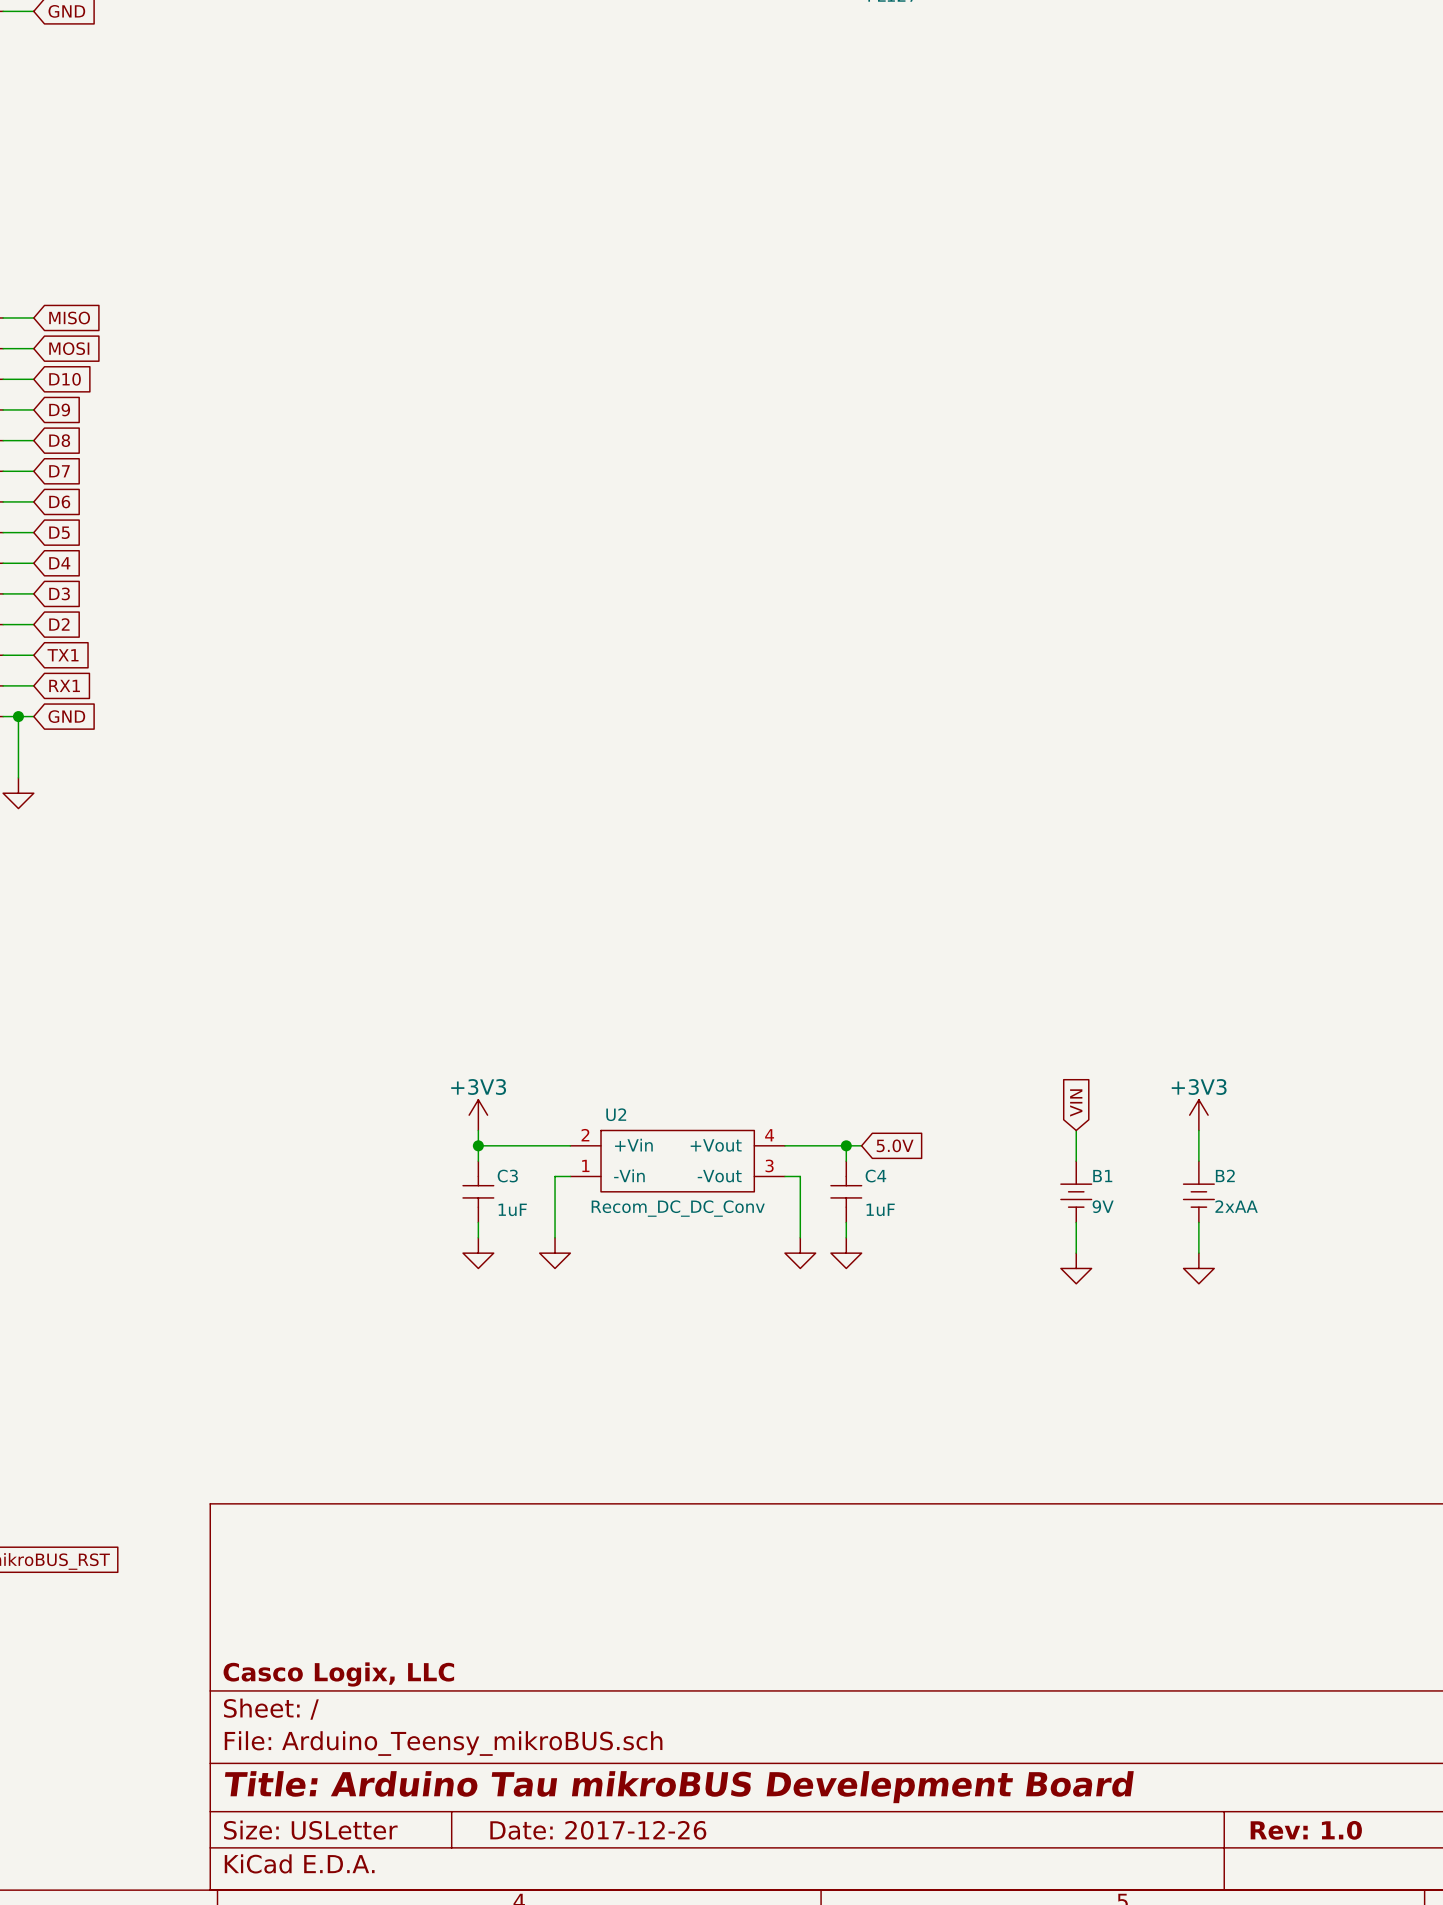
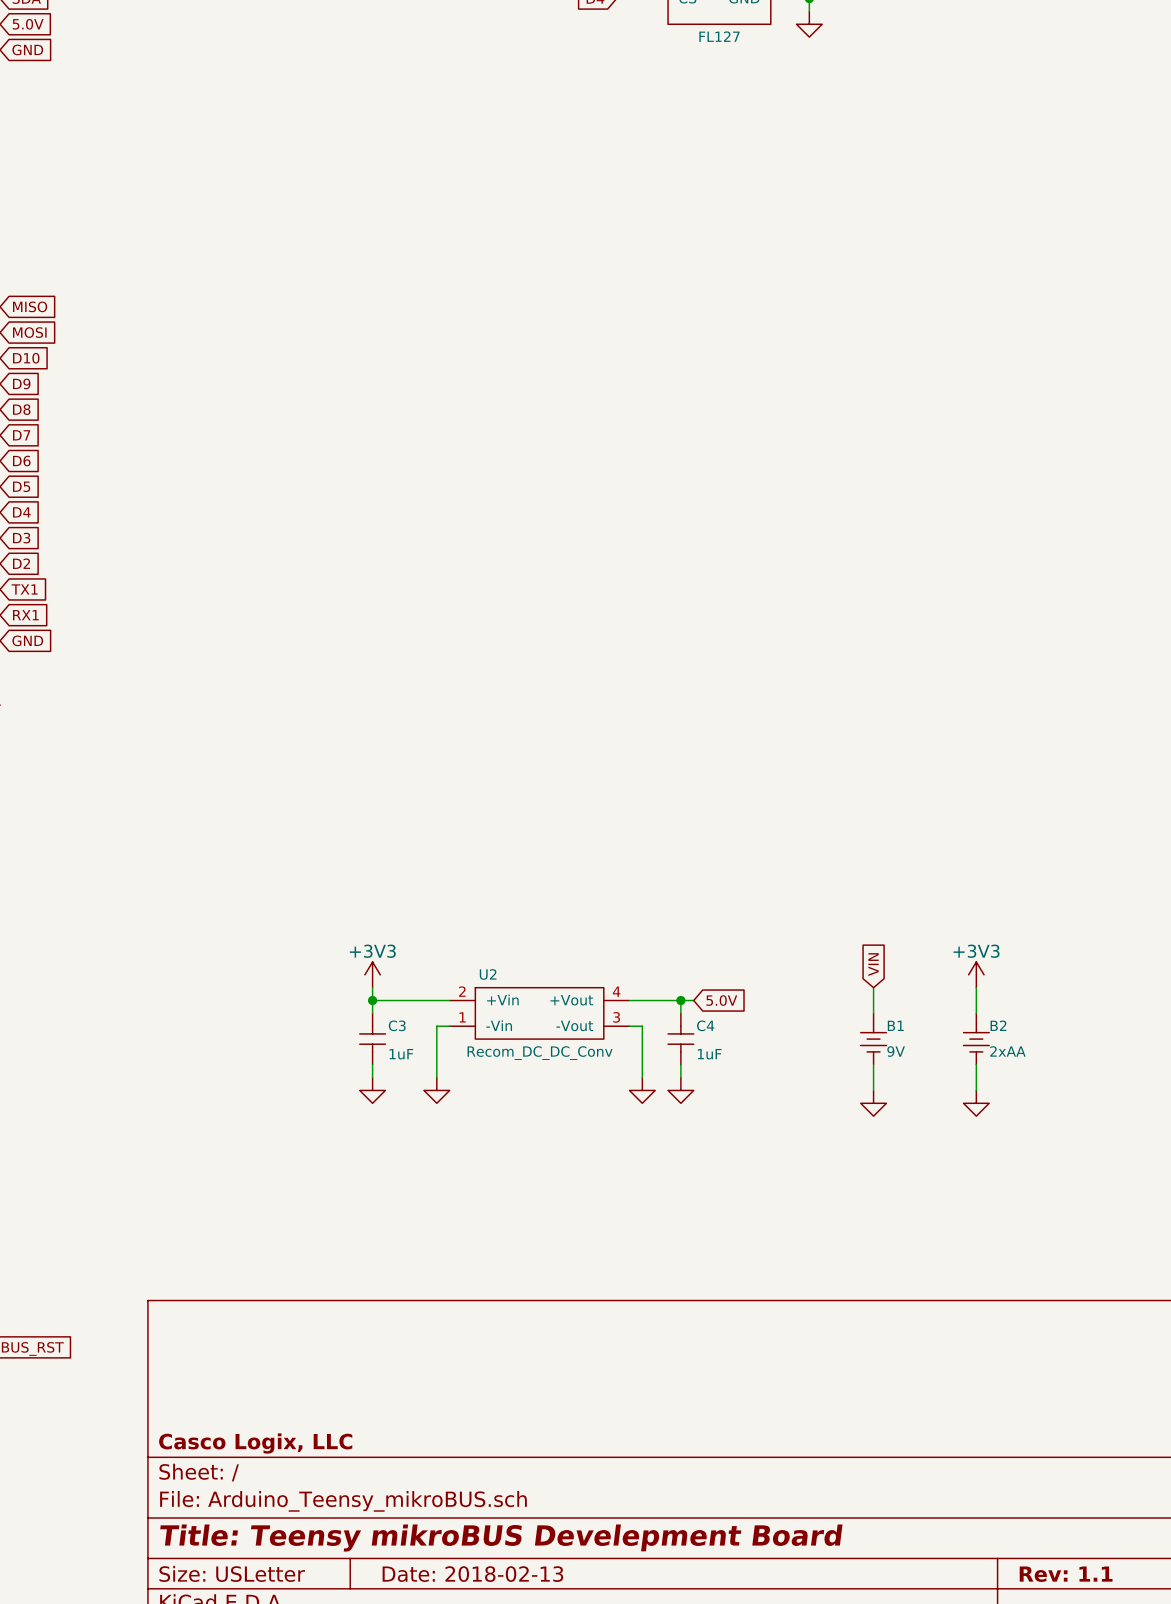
title block: Title: Arduino Tau mikroBUS Develepment Board (679, 1787) -> Title: Teensy mikroBUS Develepment Board (501, 1538)
title block: Date: 2017-12-26 (598, 1830) -> Date: 2018-02-13 (472, 1574)
title block: Rev: 1.0 (1306, 1830) -> Rev: 1.1 (1066, 1574)

